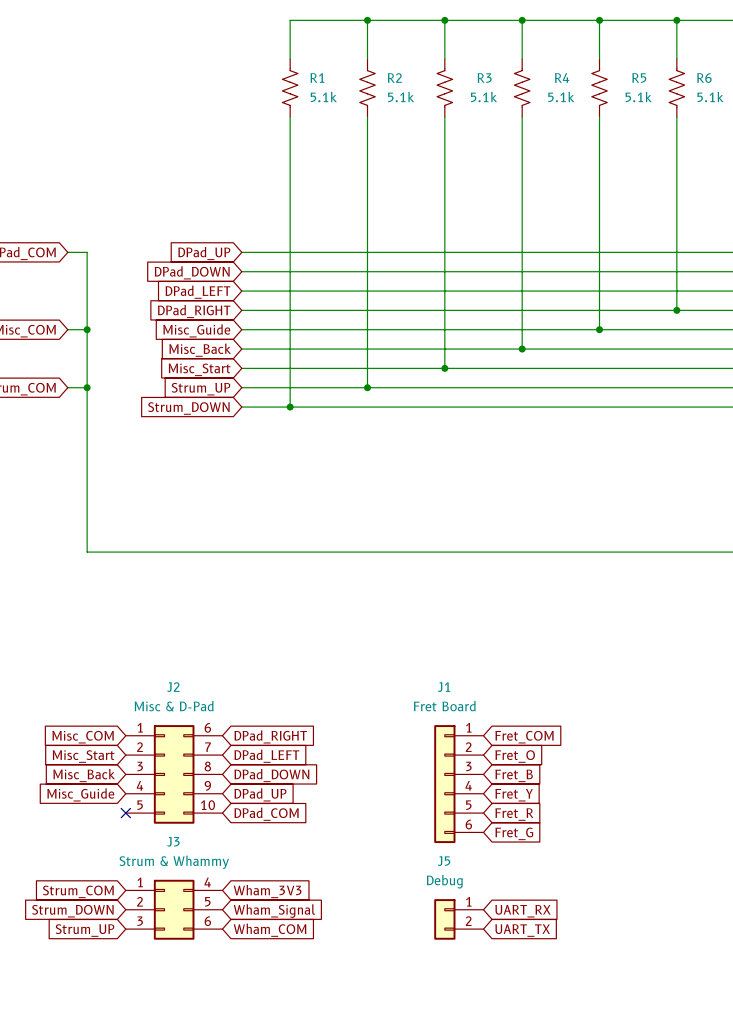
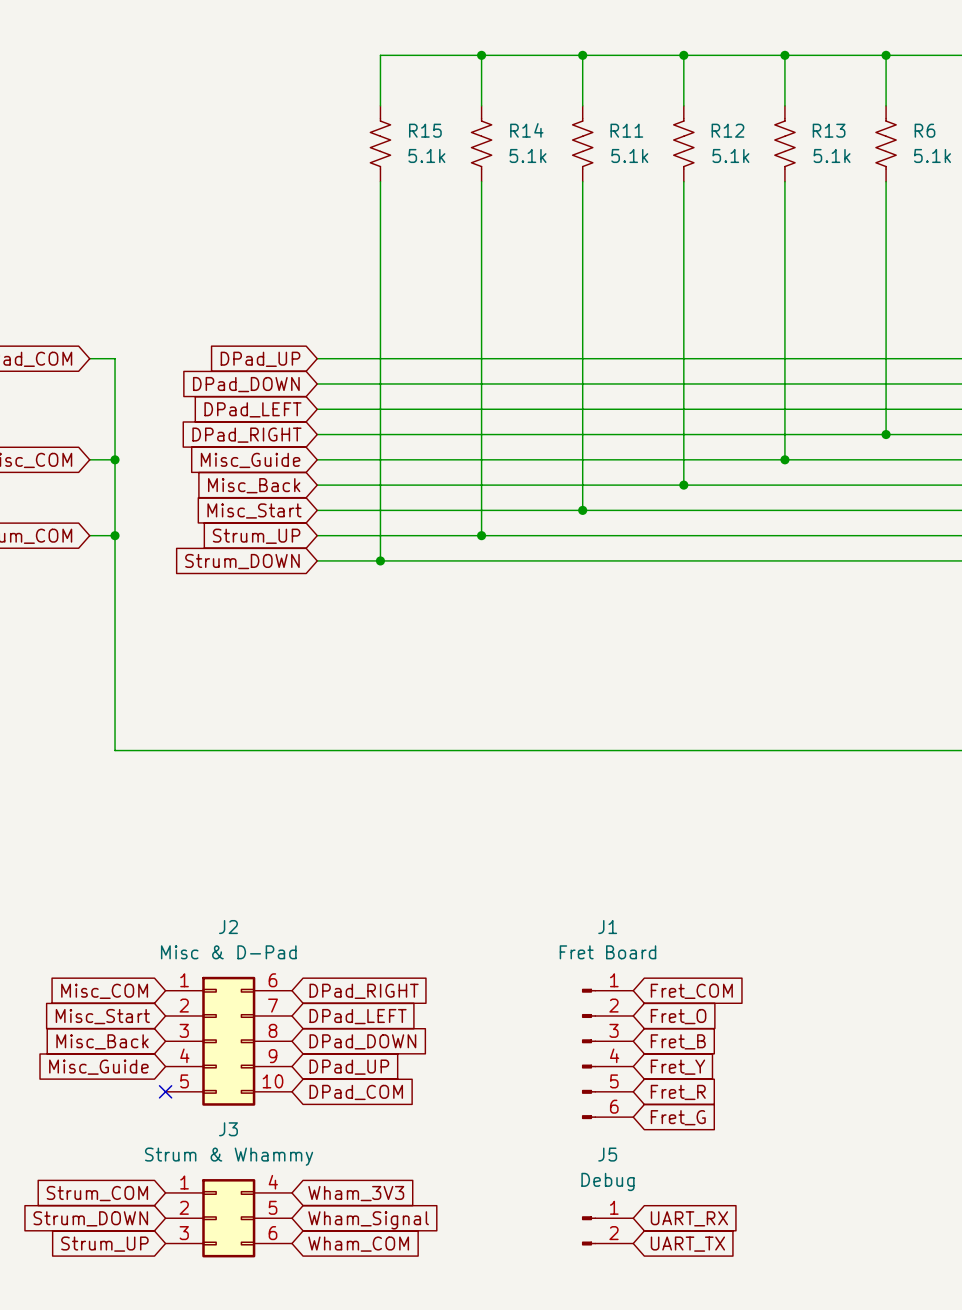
R1 name: R1 (317, 77) -> R15 (425, 130)
R4 name: R4 (562, 77) -> R12 (727, 130)
R2 name: R2 (394, 78) -> R14 (526, 130)
R3 name: R3 (484, 78) -> R11 (626, 130)
R5 name: R5 (639, 78) -> R13 (829, 130)
J1 symbol: [434, 725, 484, 844] -> [581, 988, 634, 1120]
J5 symbol: [434, 899, 484, 940] -> [581, 1216, 634, 1246]

